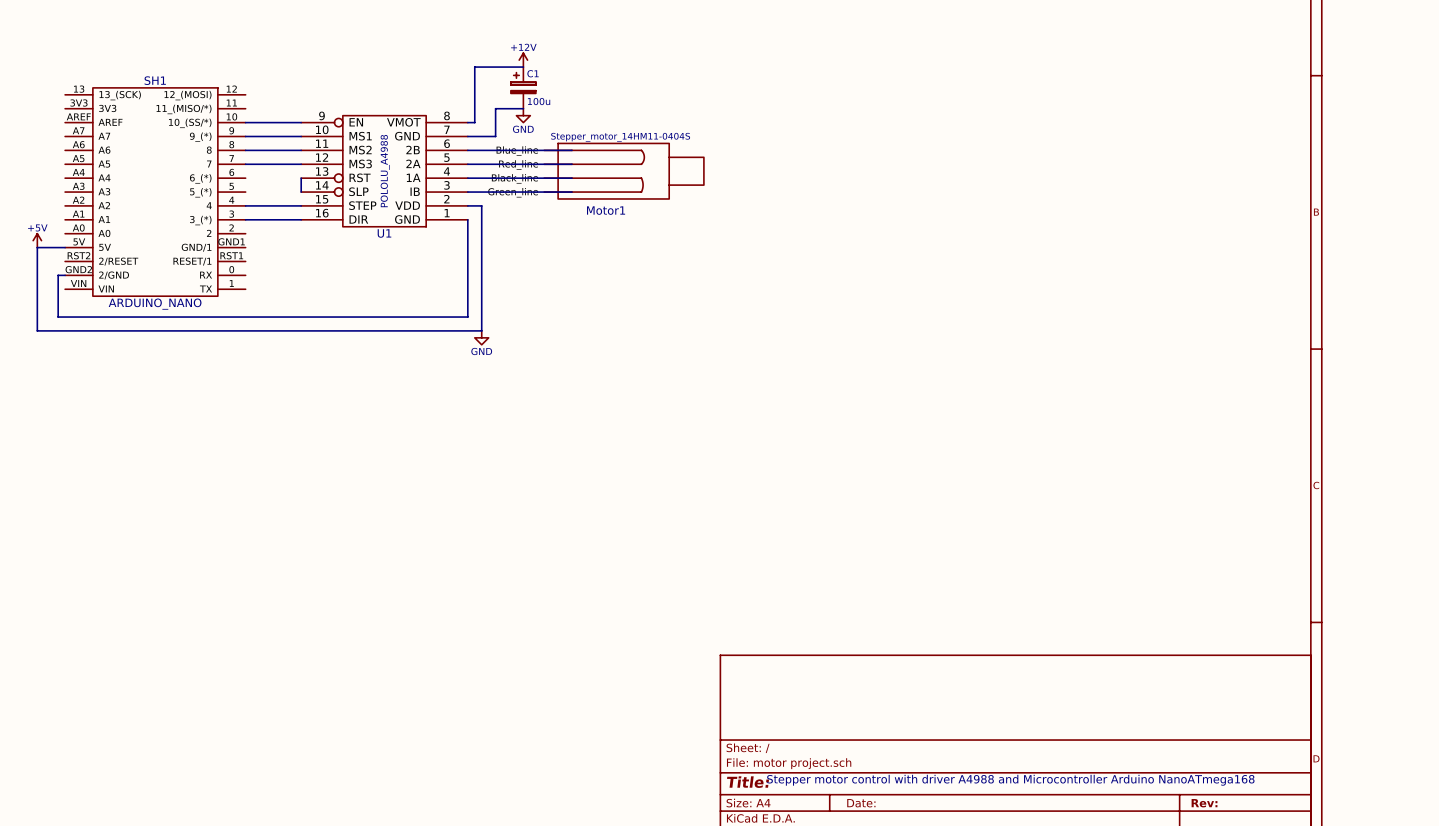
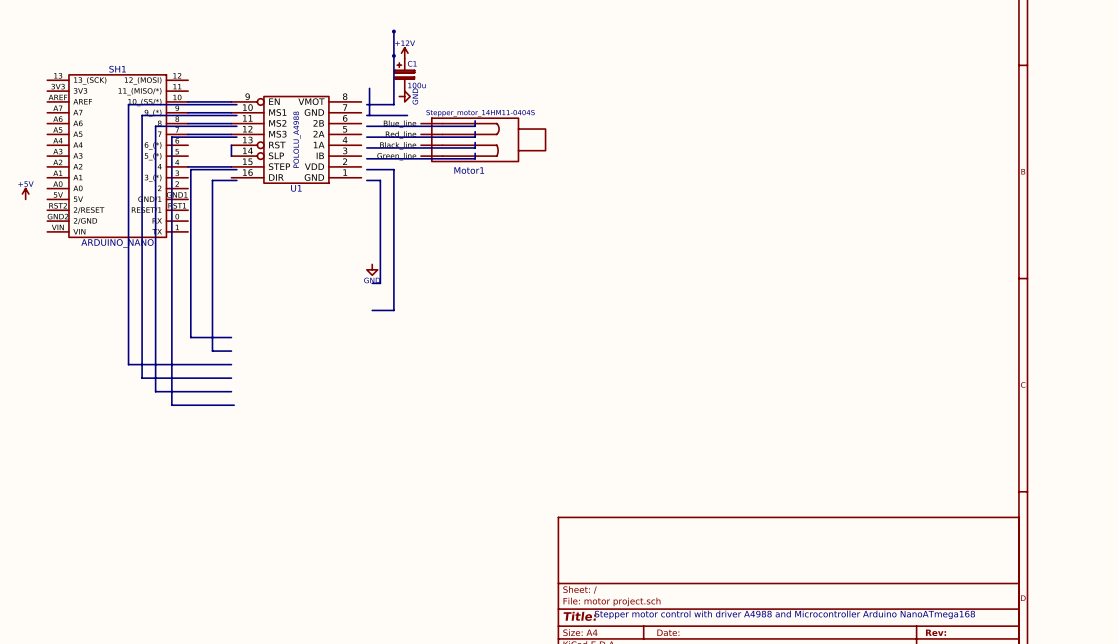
wire: none -> (393, 31) (393, 104) (366, 104)
junction: none -> (393, 31)
junction: none -> (393, 55)
wire: (523, 67) (474, 67) (474, 122) (467, 122) -> none
wire: none -> (369, 88) (369, 115)
wire: (523, 108) (495, 108) (495, 136) (467, 136) -> none
power symbol rotation: 0° (523, 115) -> 90° counterclockwise (404, 96)
wire: none -> (236, 104) (128, 104) (128, 364) (231, 364)
wire: none -> (236, 115) (142, 115) (142, 378) (231, 378)
wire: none -> (366, 115) (407, 115)
wire: none -> (475, 120) (475, 126) (366, 126)
wire: (467, 150) (571, 150) -> none
wire: none -> (236, 126) (155, 126) (155, 391) (231, 391)
wire: none -> (475, 131) (475, 137) (366, 137)
wire: (467, 164) (571, 164) -> none
wire: none -> (236, 137) (171, 137) (171, 405) (234, 405)
wire: none -> (475, 142) (475, 147) (366, 147)
wire: (467, 178) (571, 178) -> none
wire: none -> (475, 153) (475, 158) (366, 158)
wire: (467, 192) (571, 192) -> none
wire: (467, 205) (481, 205) (481, 330) (37, 330) (37, 247) (65, 247) -> none
wire: none -> (236, 169) (190, 169) (190, 337) (231, 337)
wire: none -> (366, 169) (393, 169) (393, 310) (372, 310)
wire: (245, 219) (301, 219) -> none
wire: (467, 219) (467, 317) (58, 317) (58, 275) (65, 275) -> none
wire: none -> (236, 180) (212, 180) (212, 351) (231, 351)
wire: none -> (366, 180) (380, 180) (380, 283) (372, 283)

